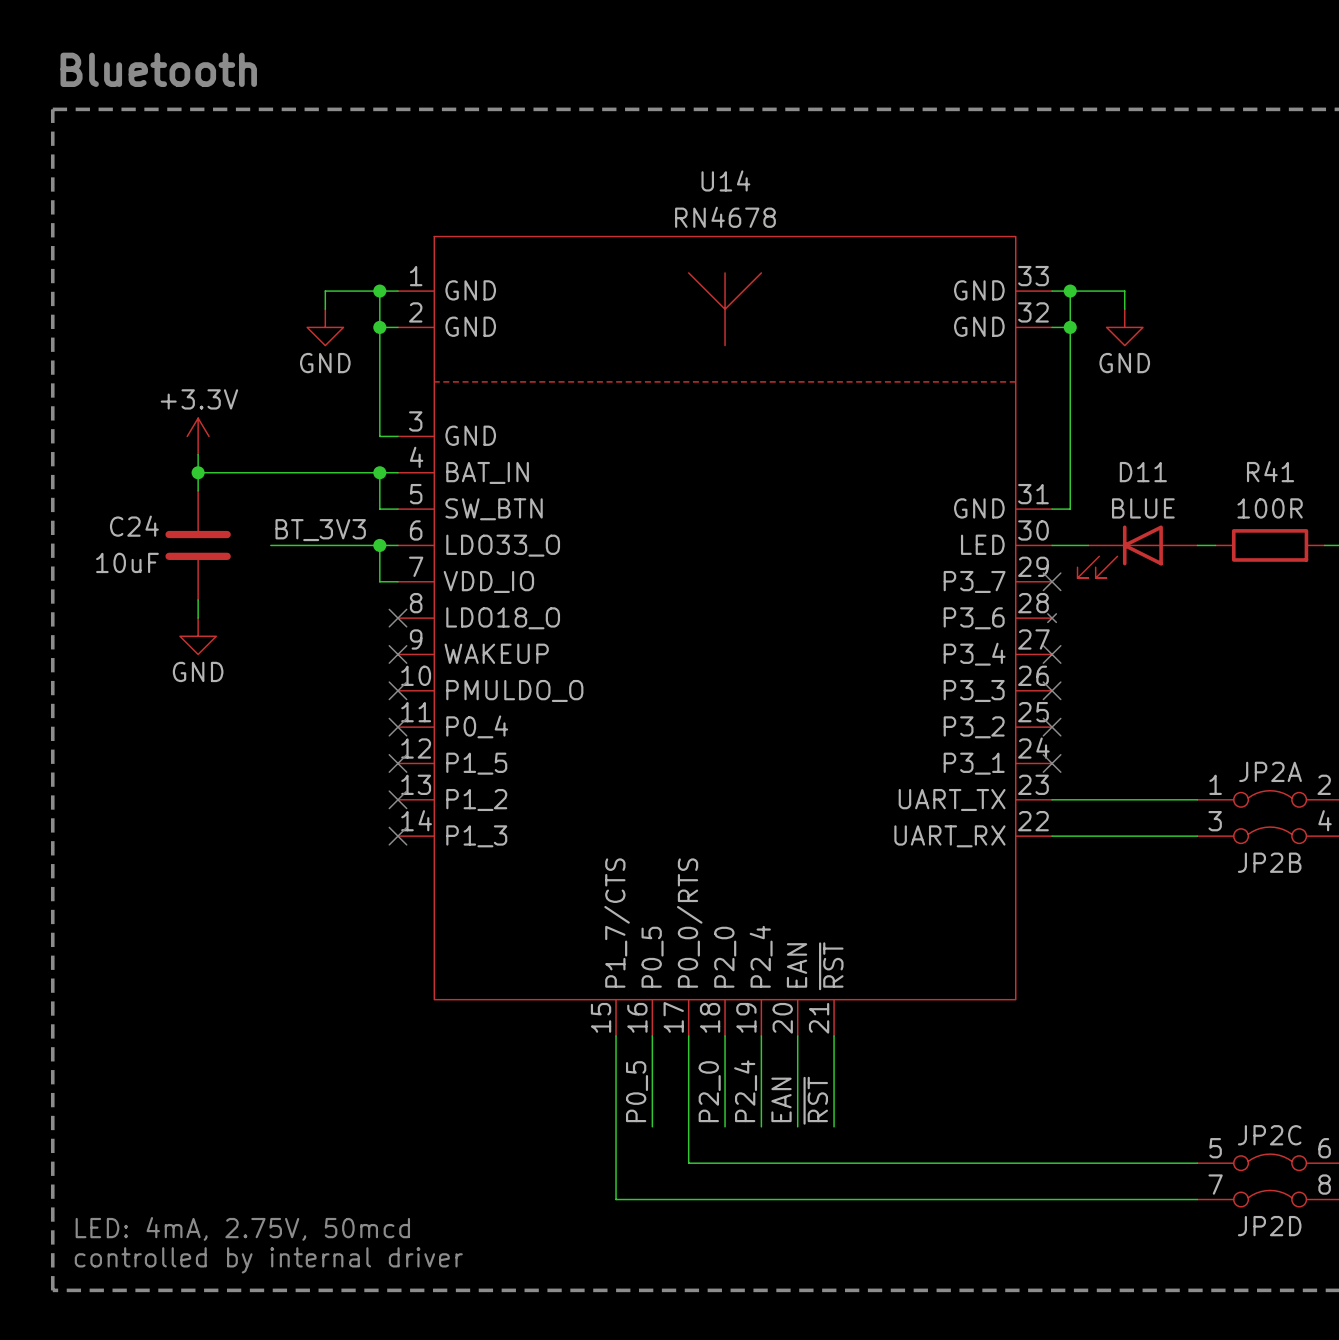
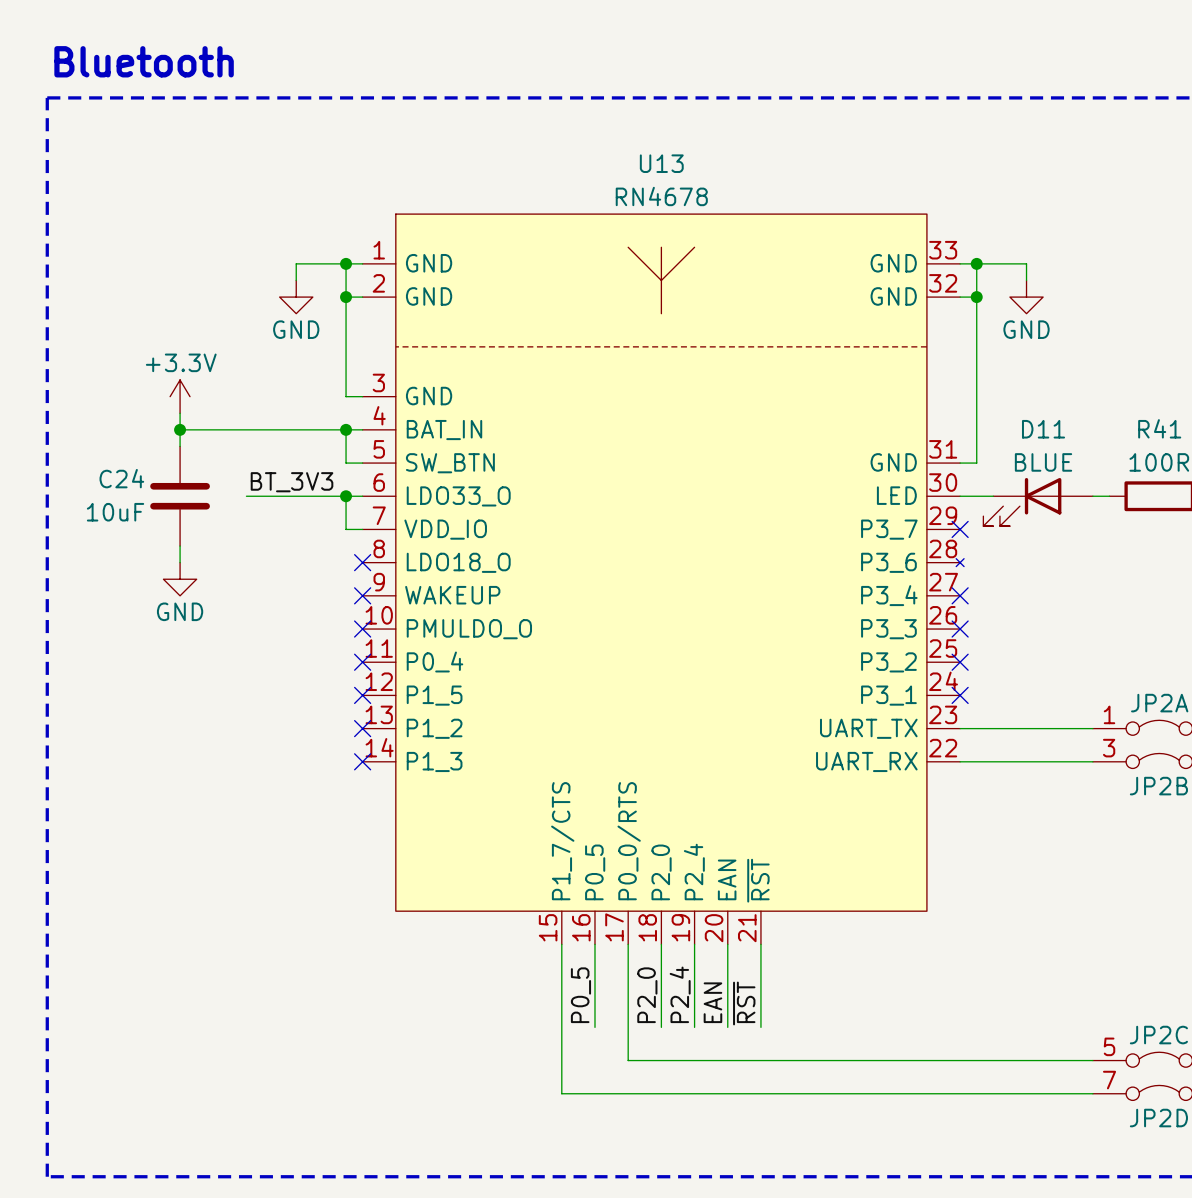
U14 name: U14 (725, 180) -> U13 (661, 163)
text: LED: 4mA, 2.75V, 50mcd (242, 1228) -> none
text: controlled by internal driver (268, 1260) -> none

